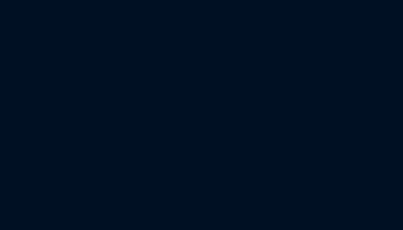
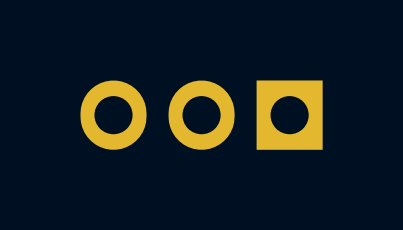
part: none -> (201, 115)

